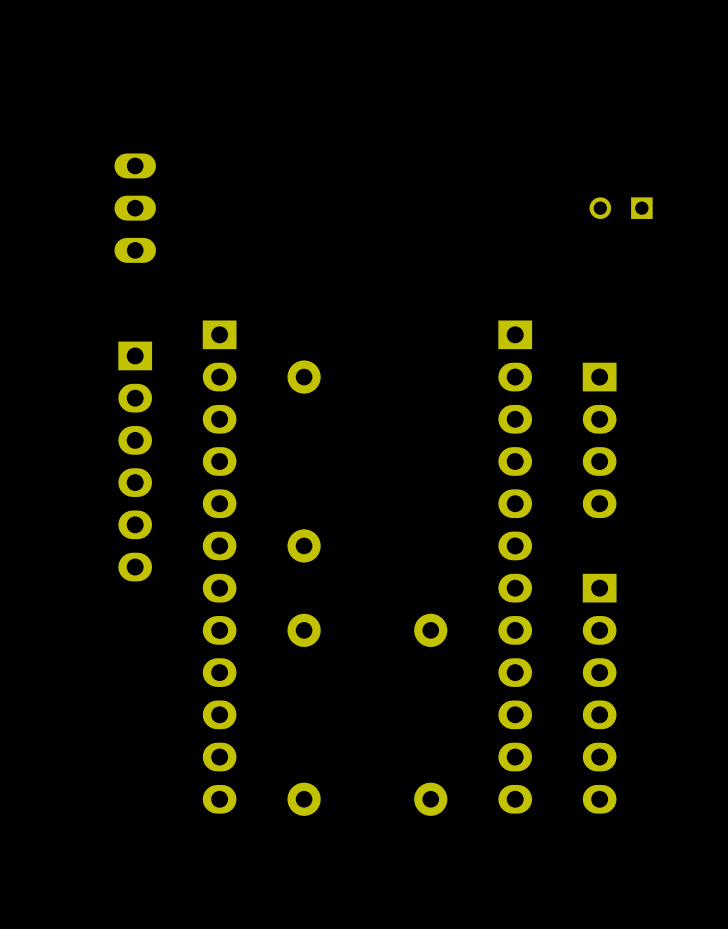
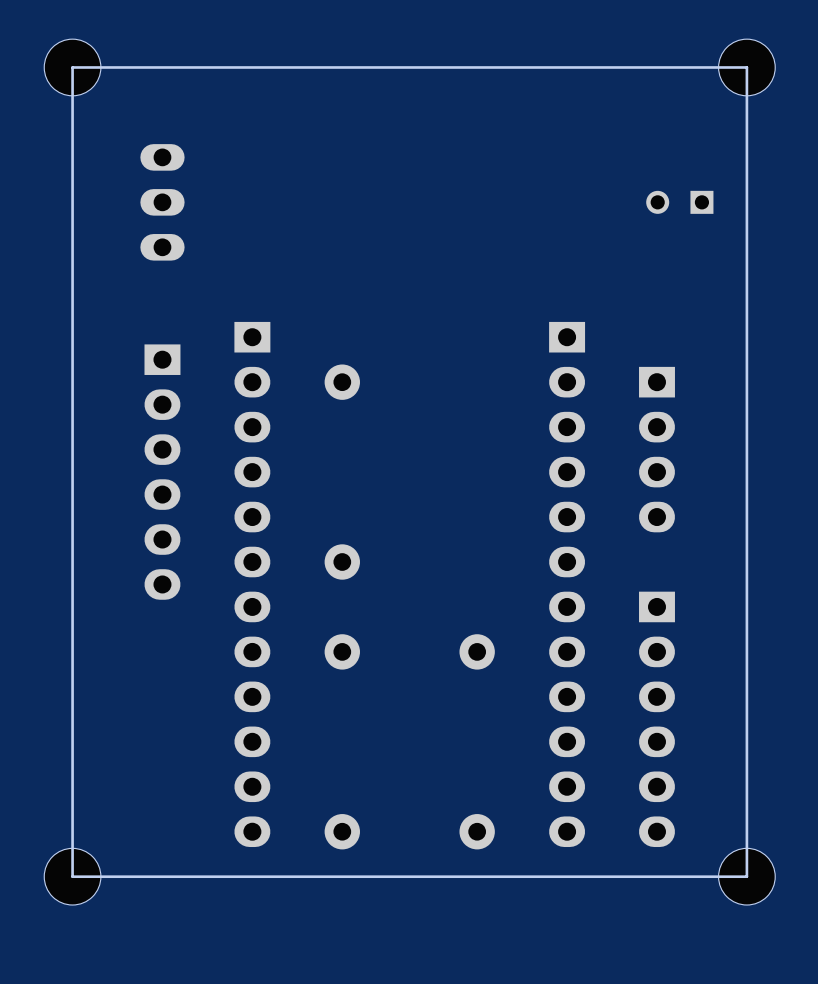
part: none -> (72, 67)
board edge: none -> (746, 67) (746, 876) (72, 876) (72, 67) (746, 67)
part: none -> (746, 67)
part: none -> (72, 876)
part: none -> (746, 876)

